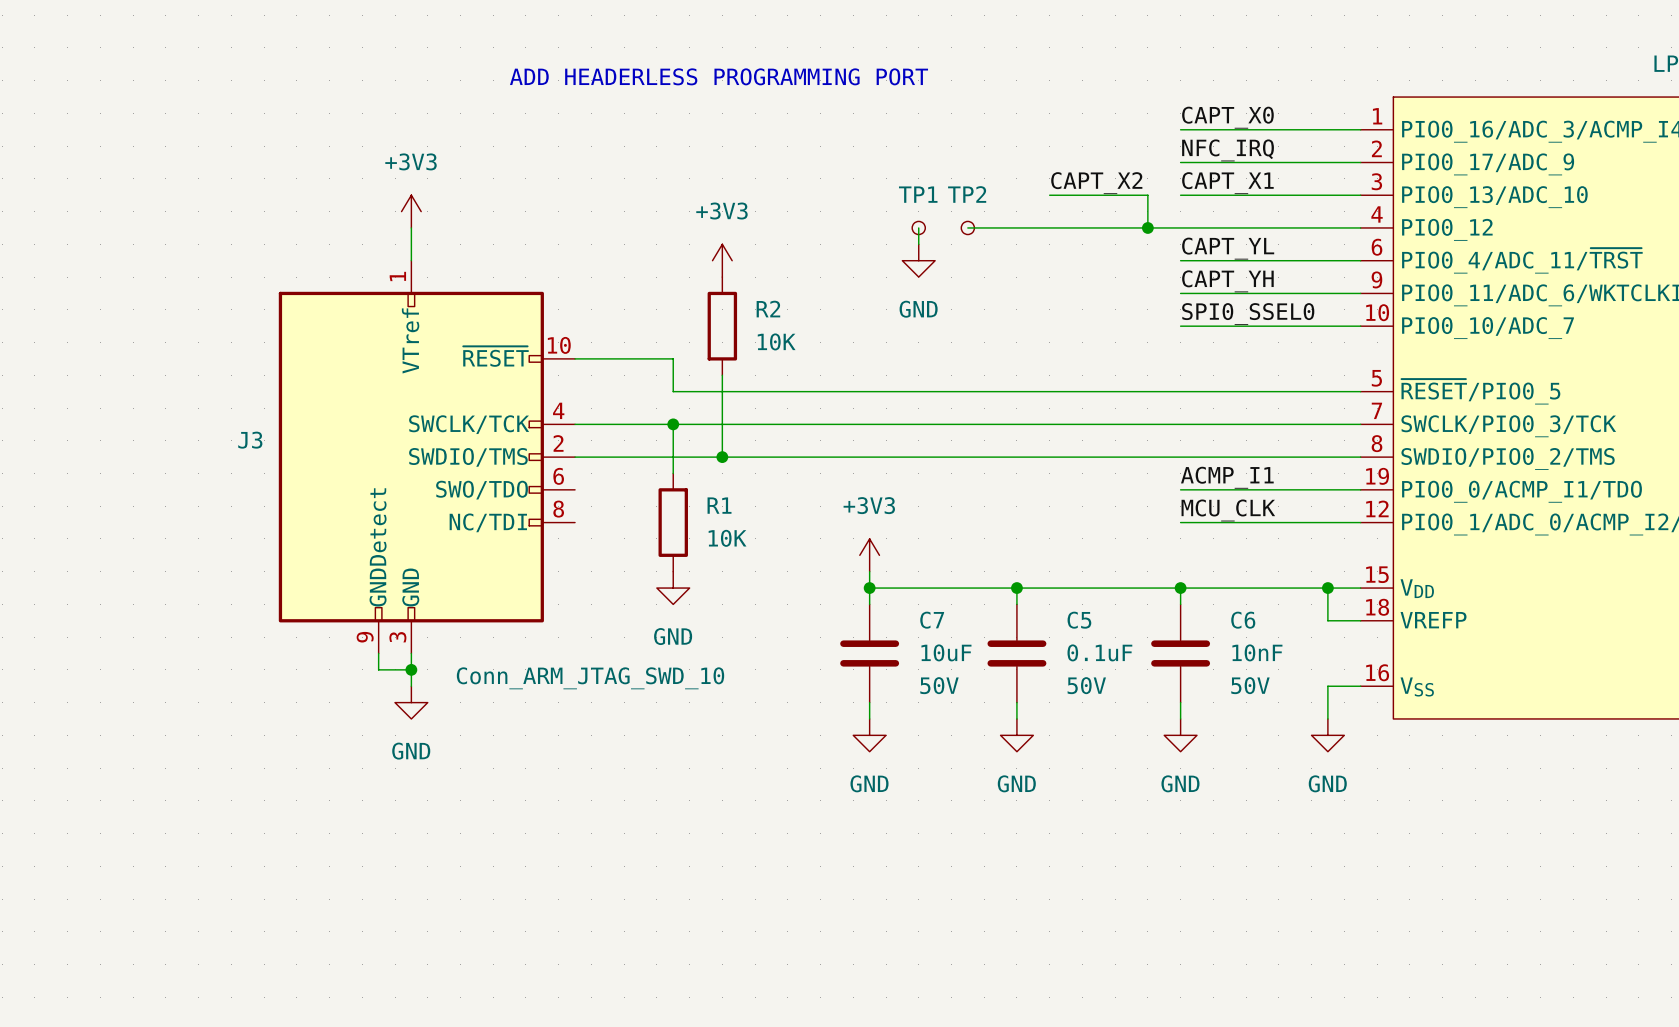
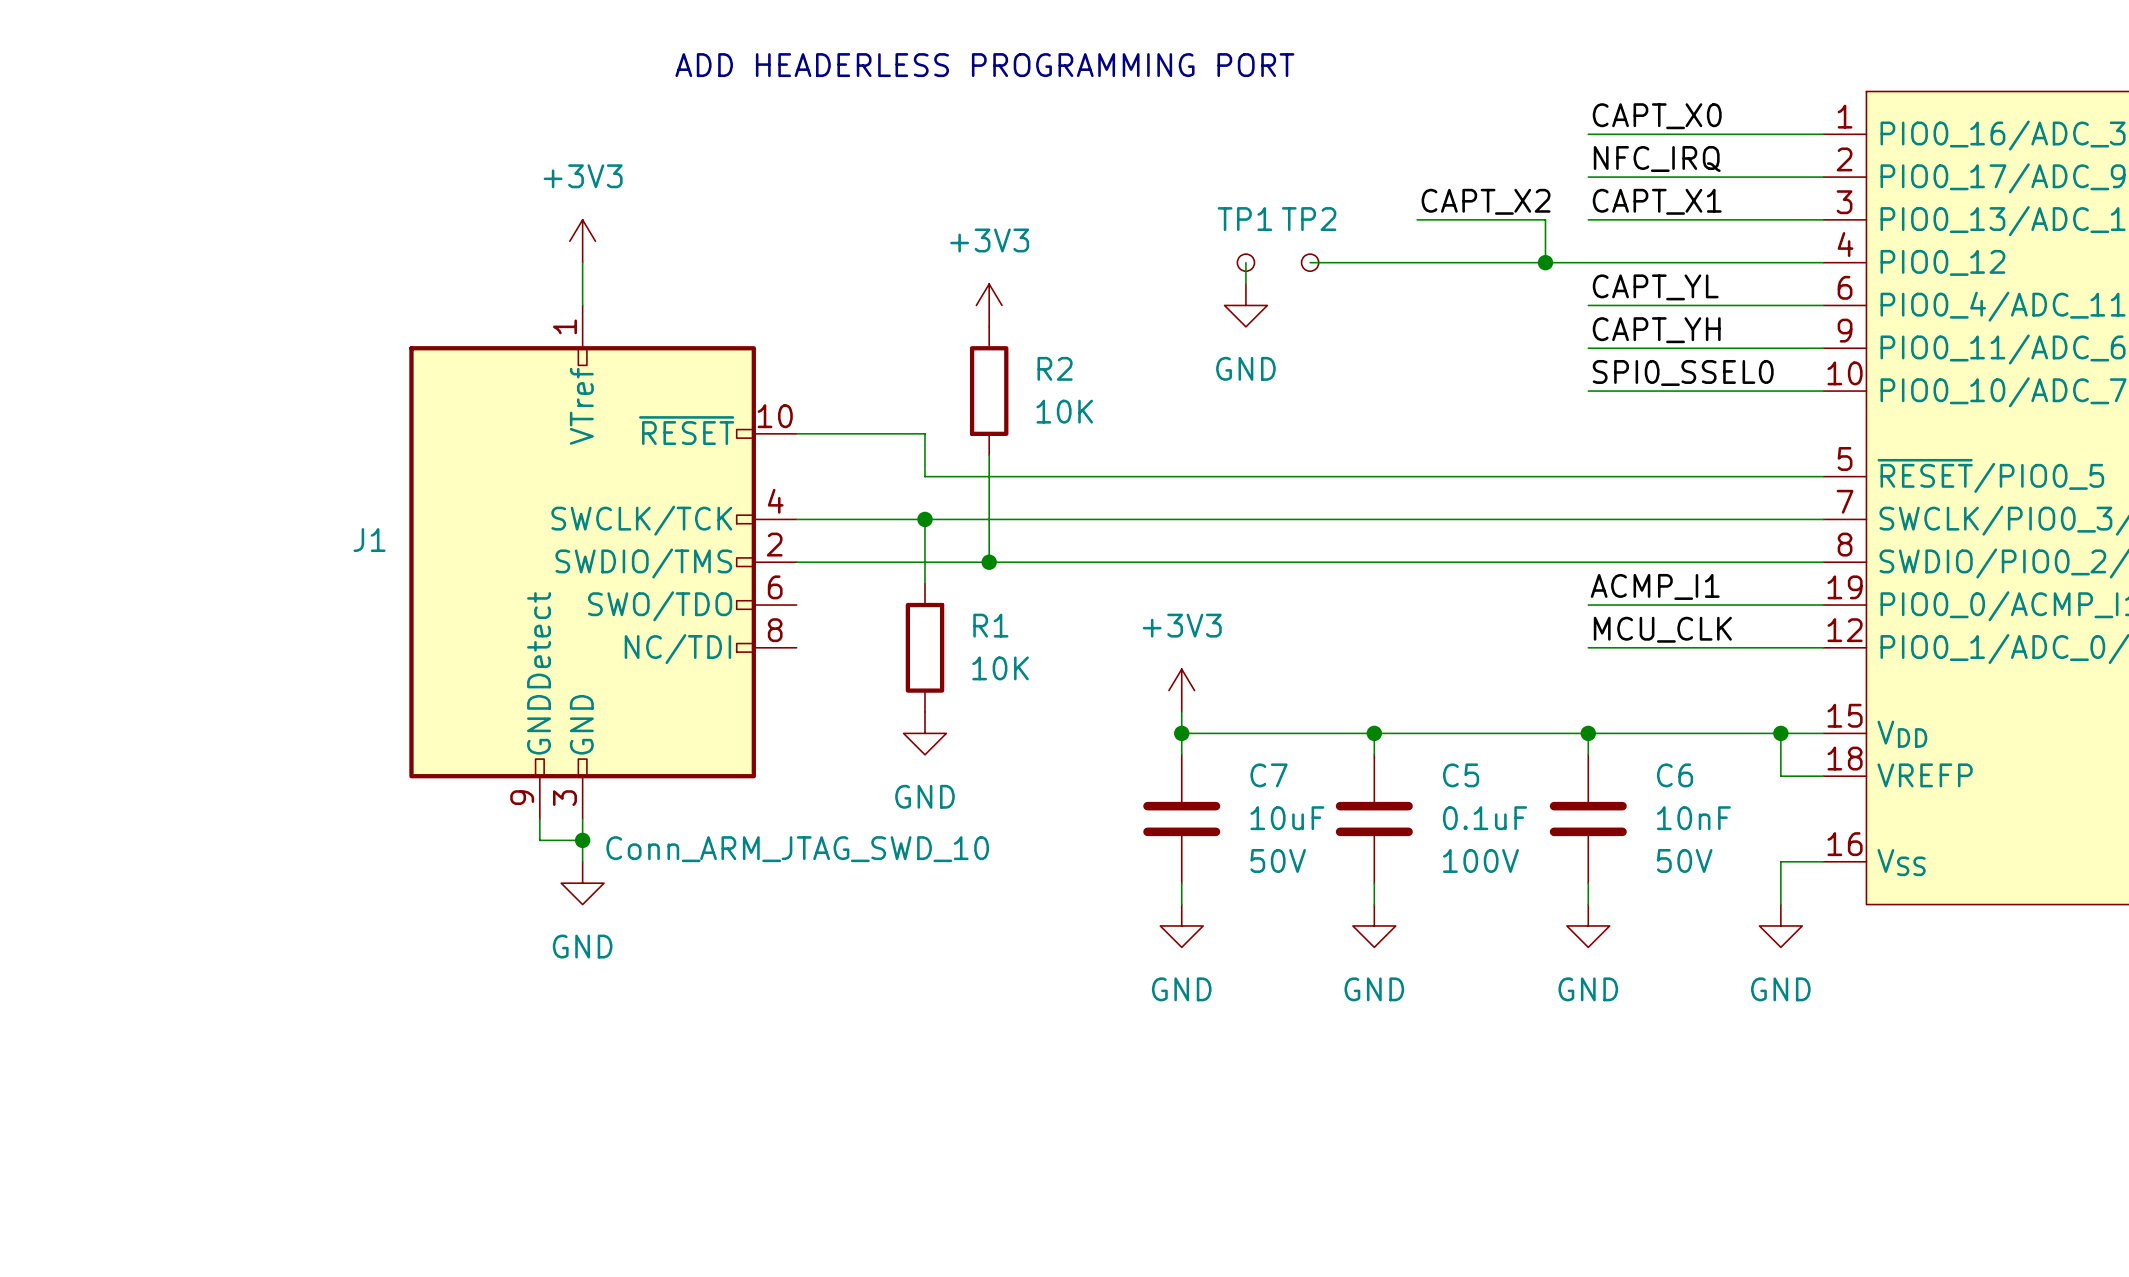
J3 name: J3 (250, 440) -> J1 (369, 540)
C5 text: 50V (1086, 685) -> 100V (1480, 860)

